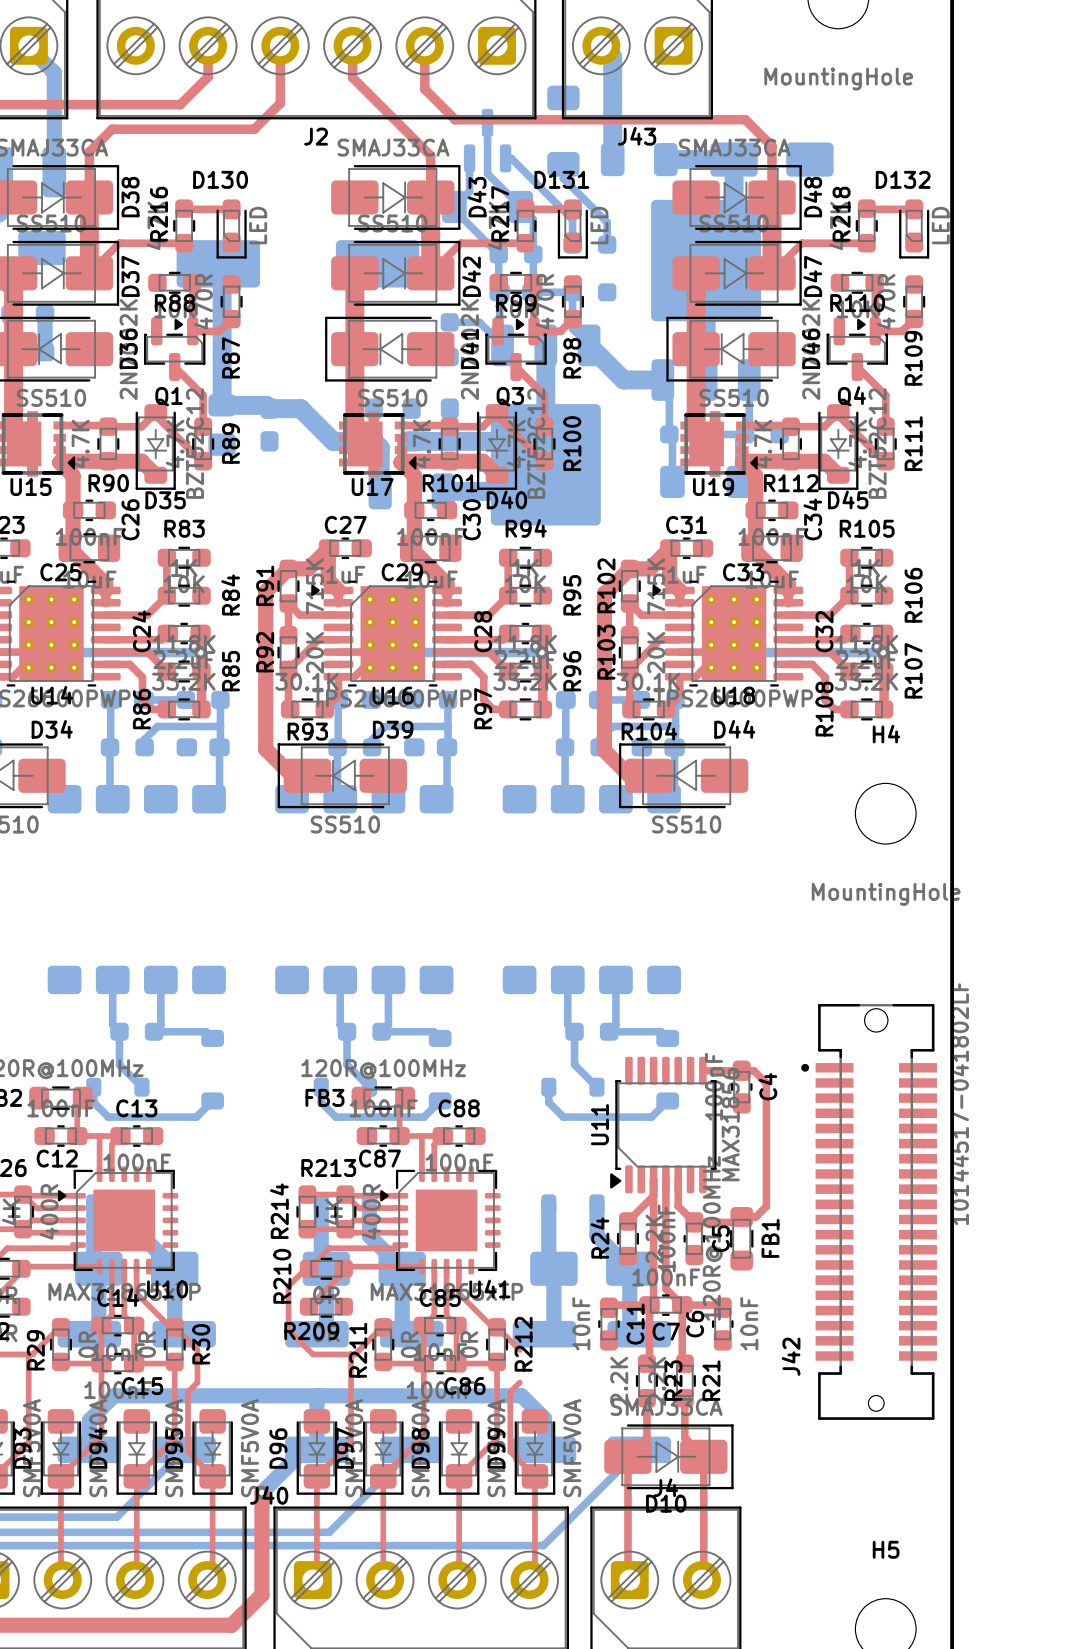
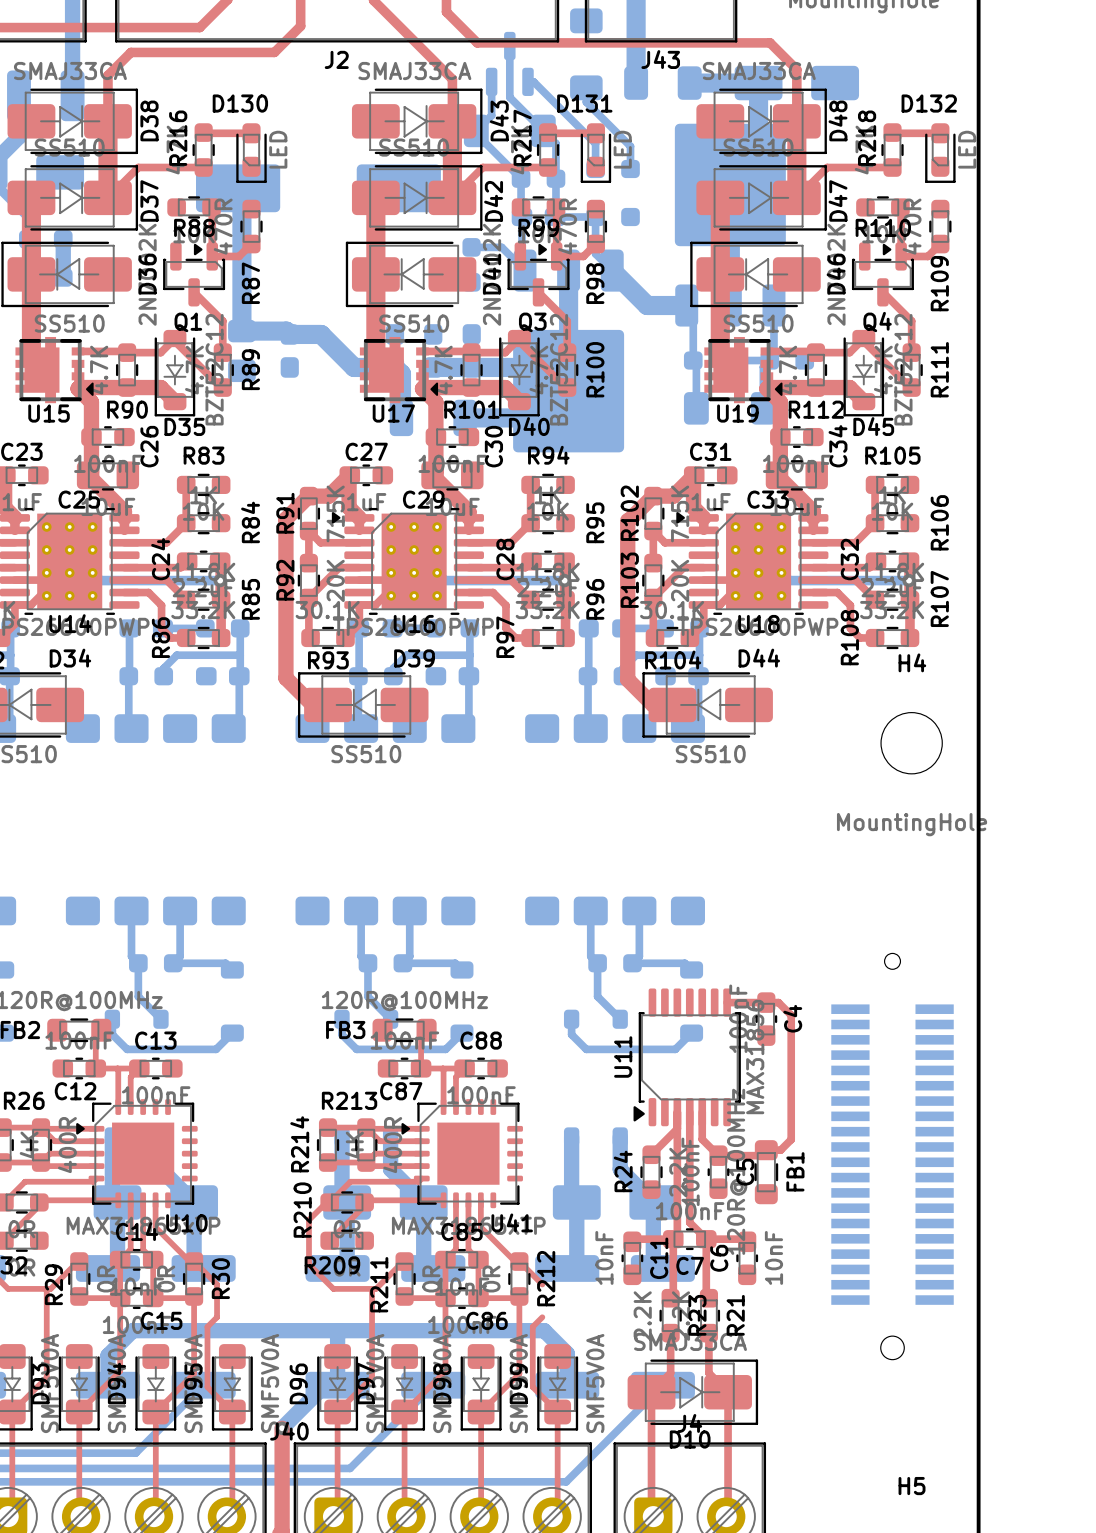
J42 side: top (869, 1211) -> bottom (892, 1156)

